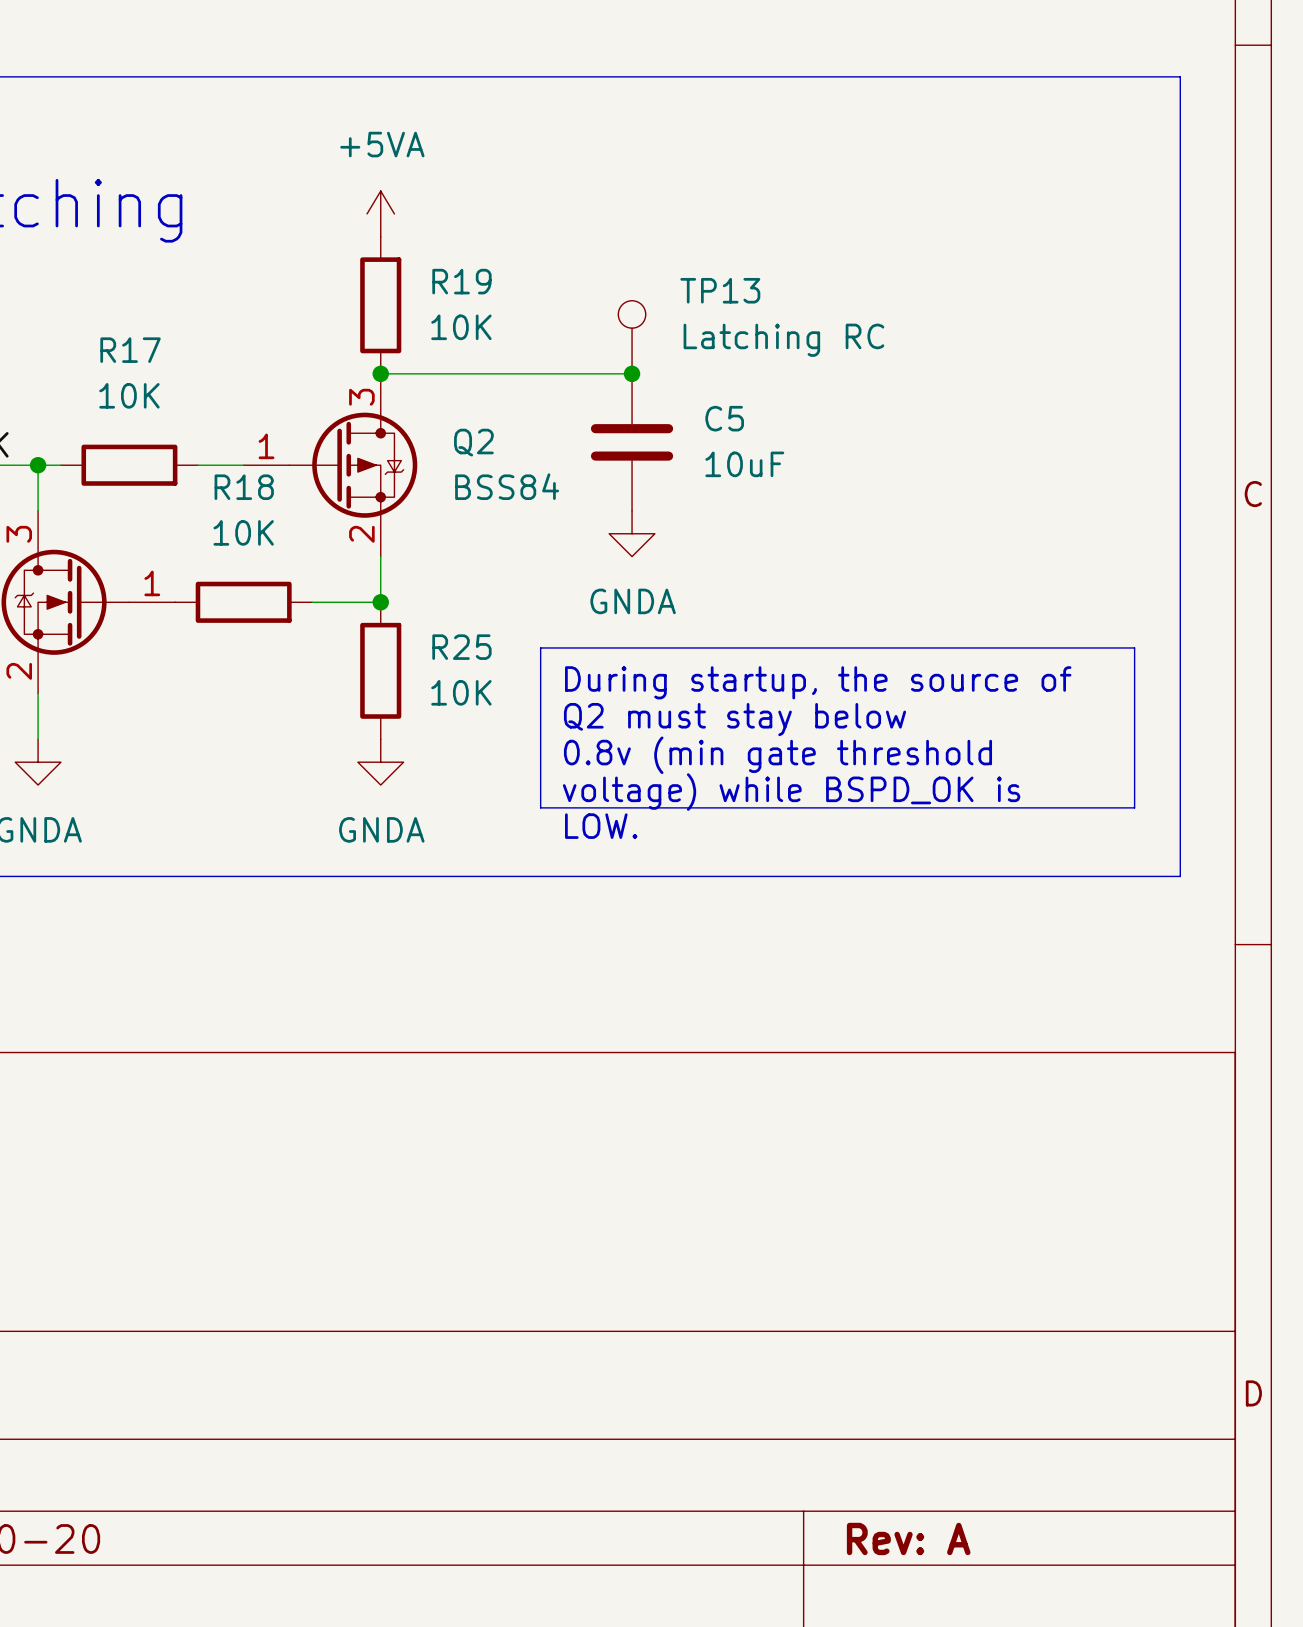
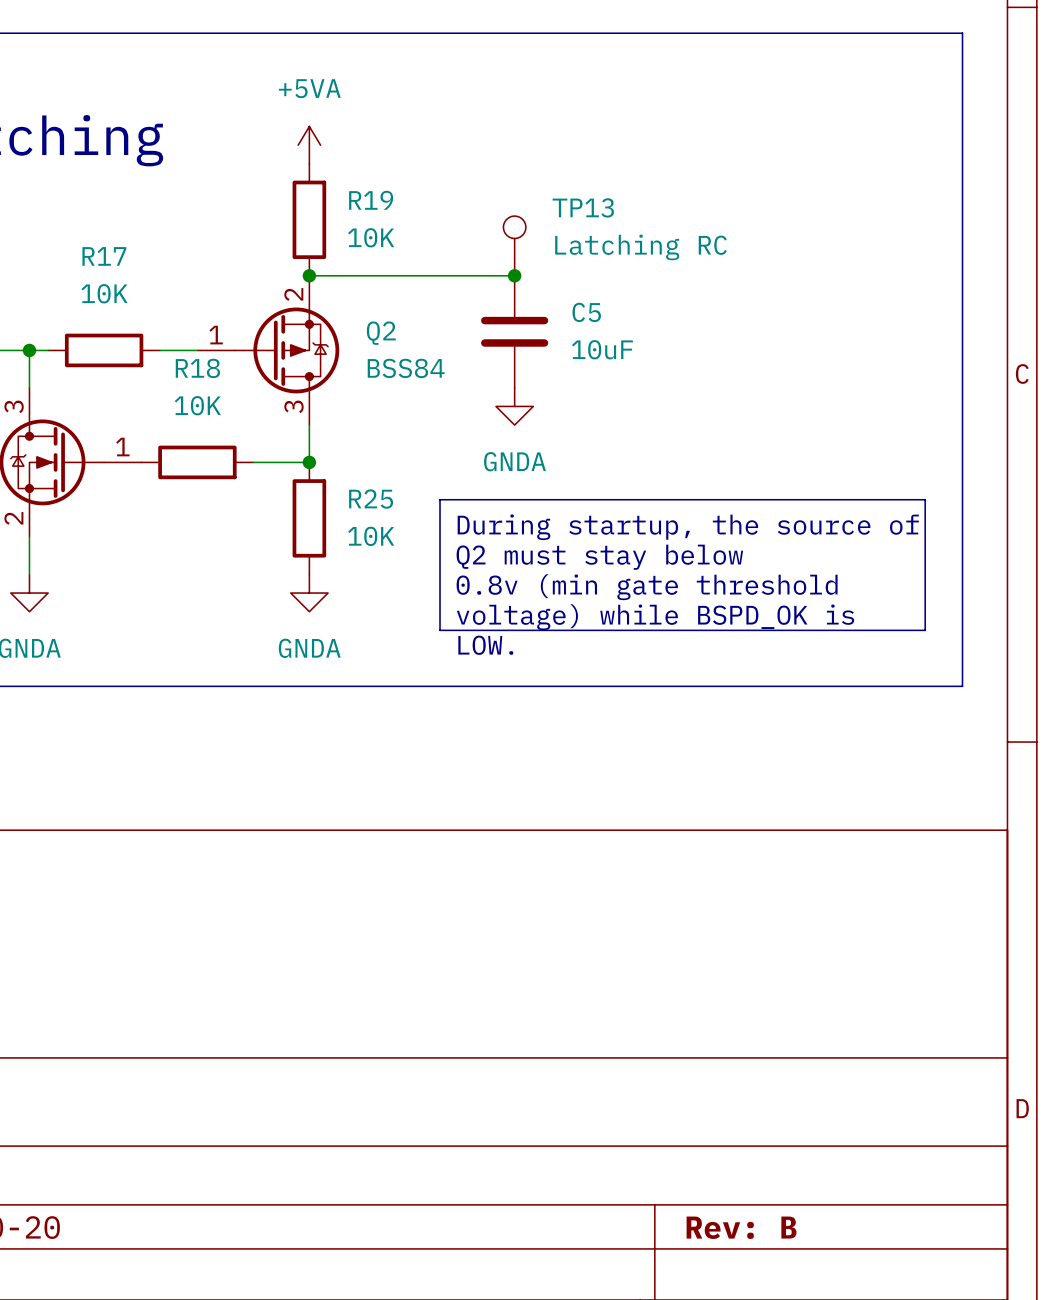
Q2 flip: as is (353, 465) -> up-down (286, 350)
title block: Rev: A (908, 1538) -> Rev: B (741, 1227)

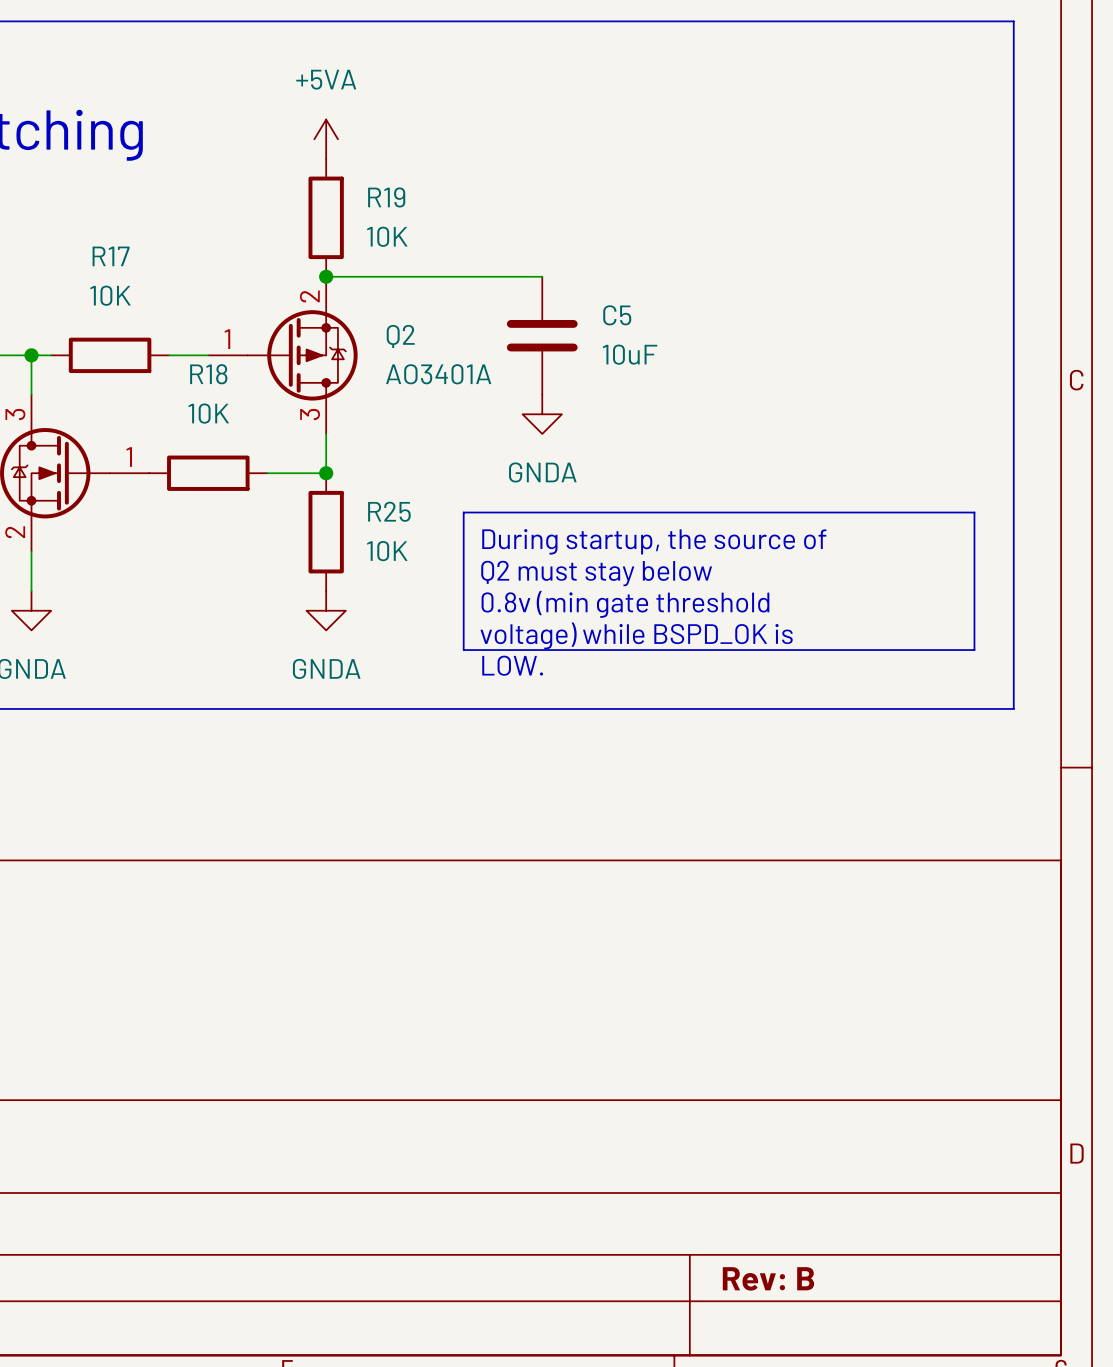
TP13: Latching RC (514, 245) -> none
junction: (514, 275) -> none
Q2 value: BSS84 (406, 368) -> AO3401A (438, 374)

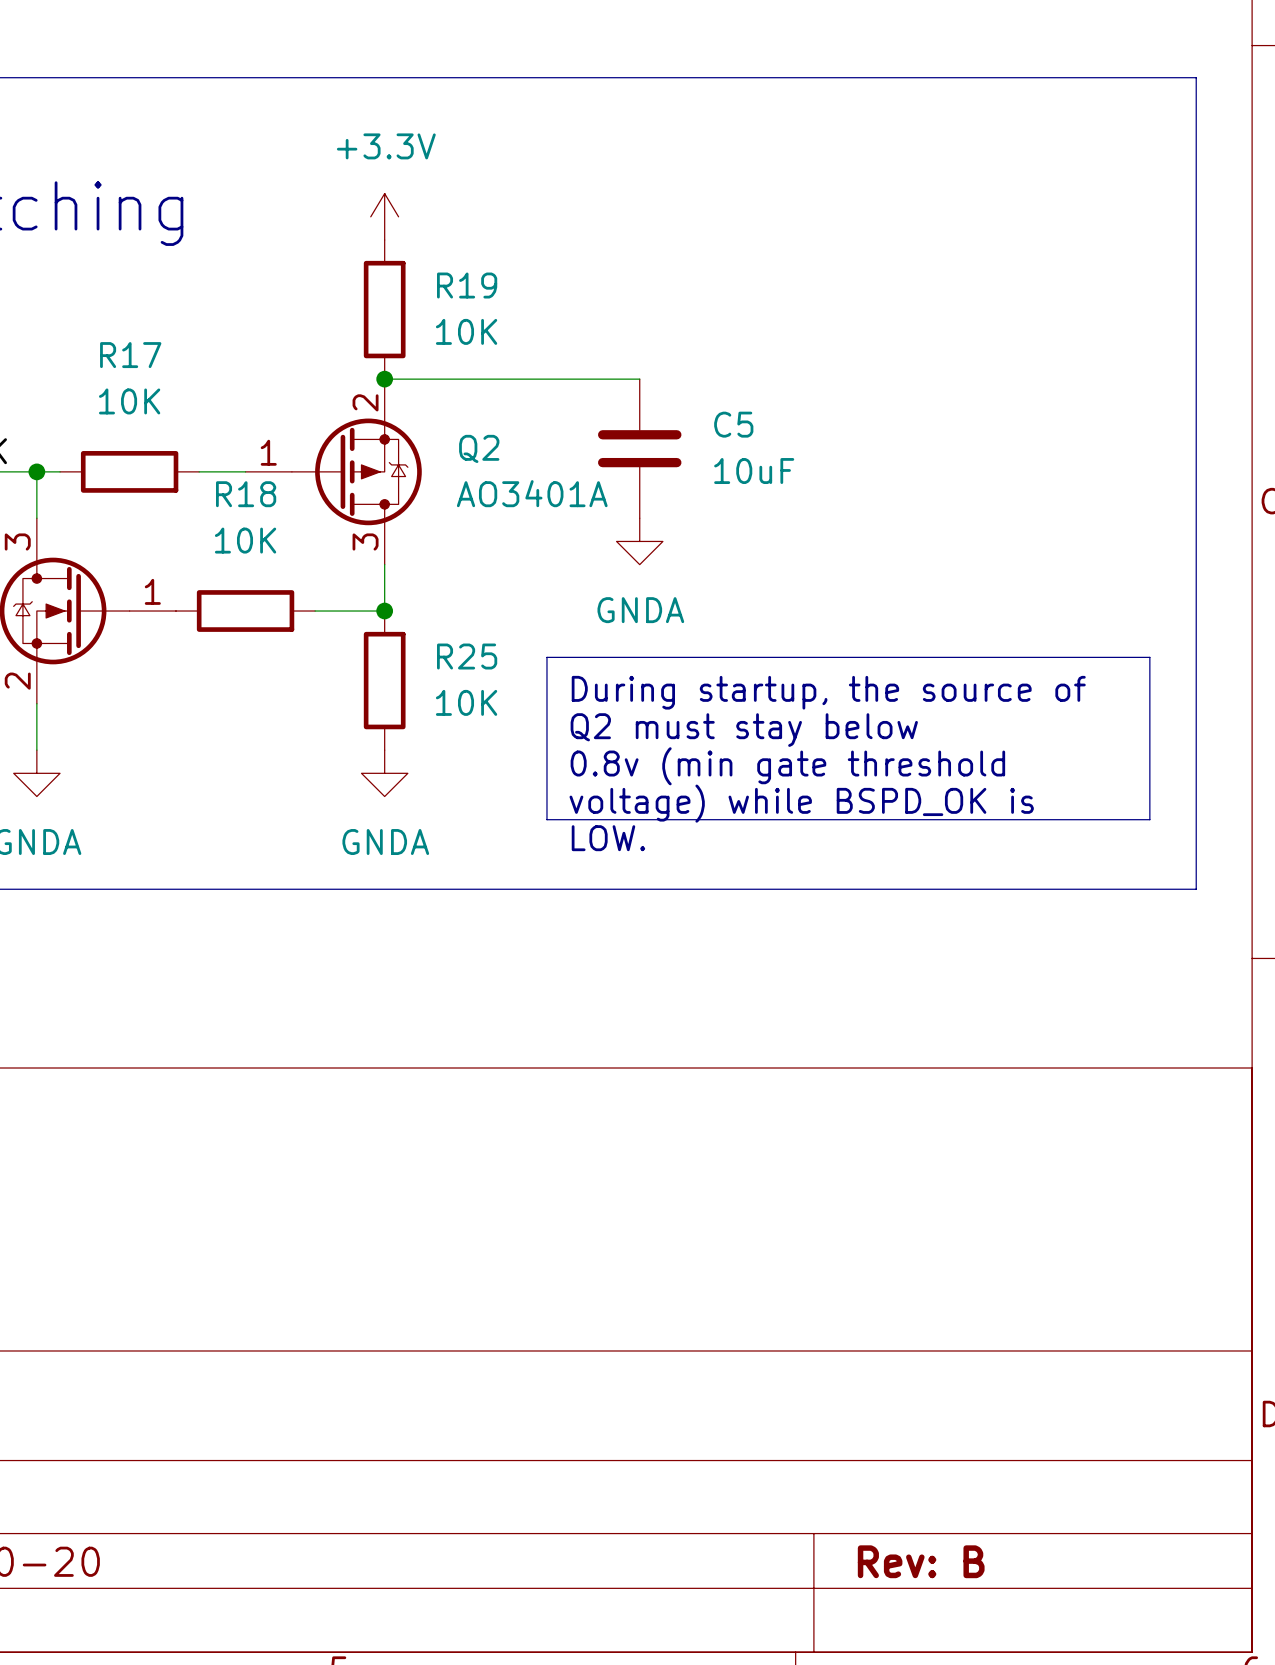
power symbol: +5VA (326, 139) -> +3.3V (384, 216)

